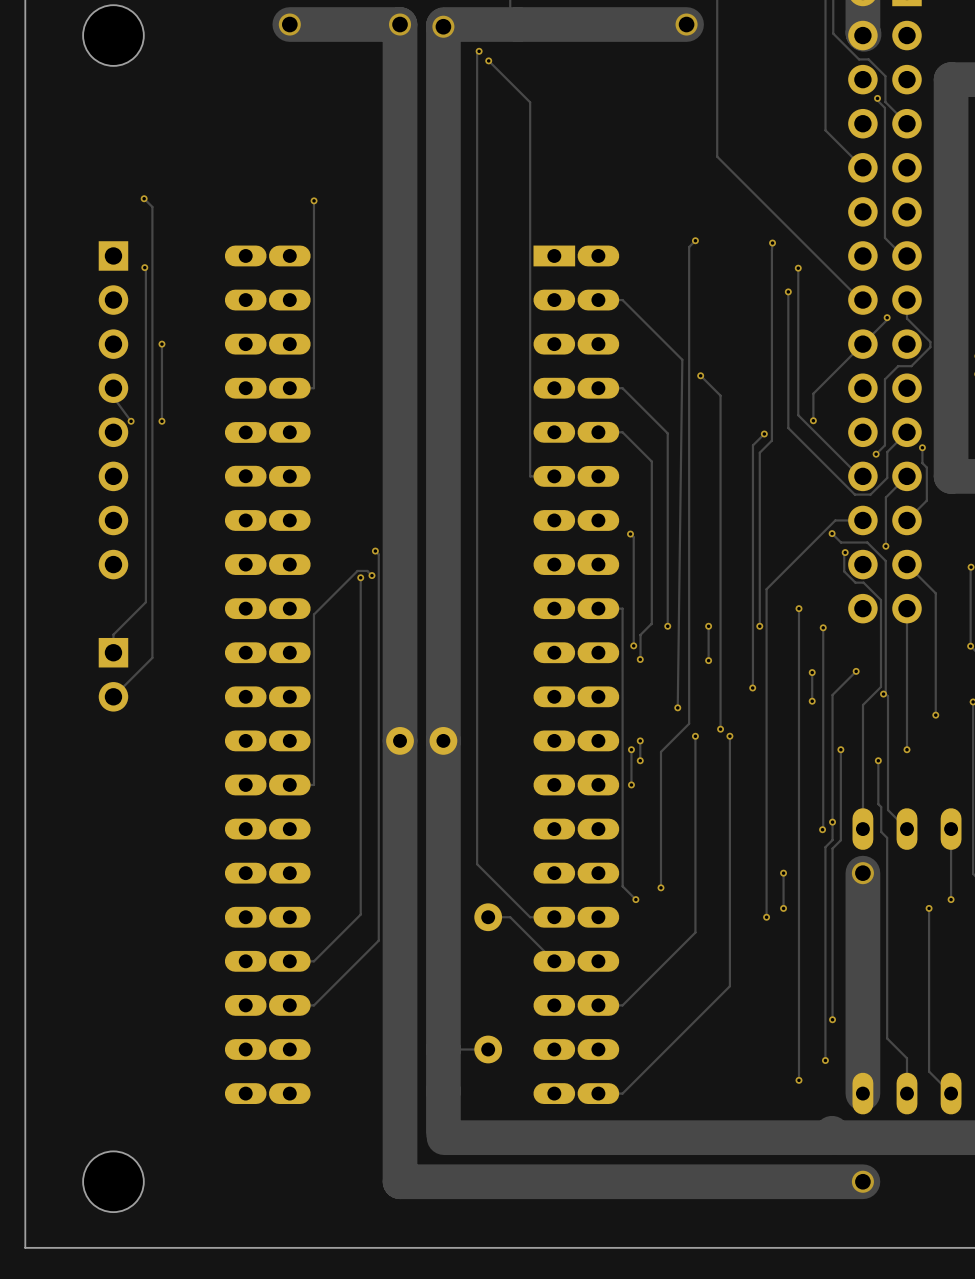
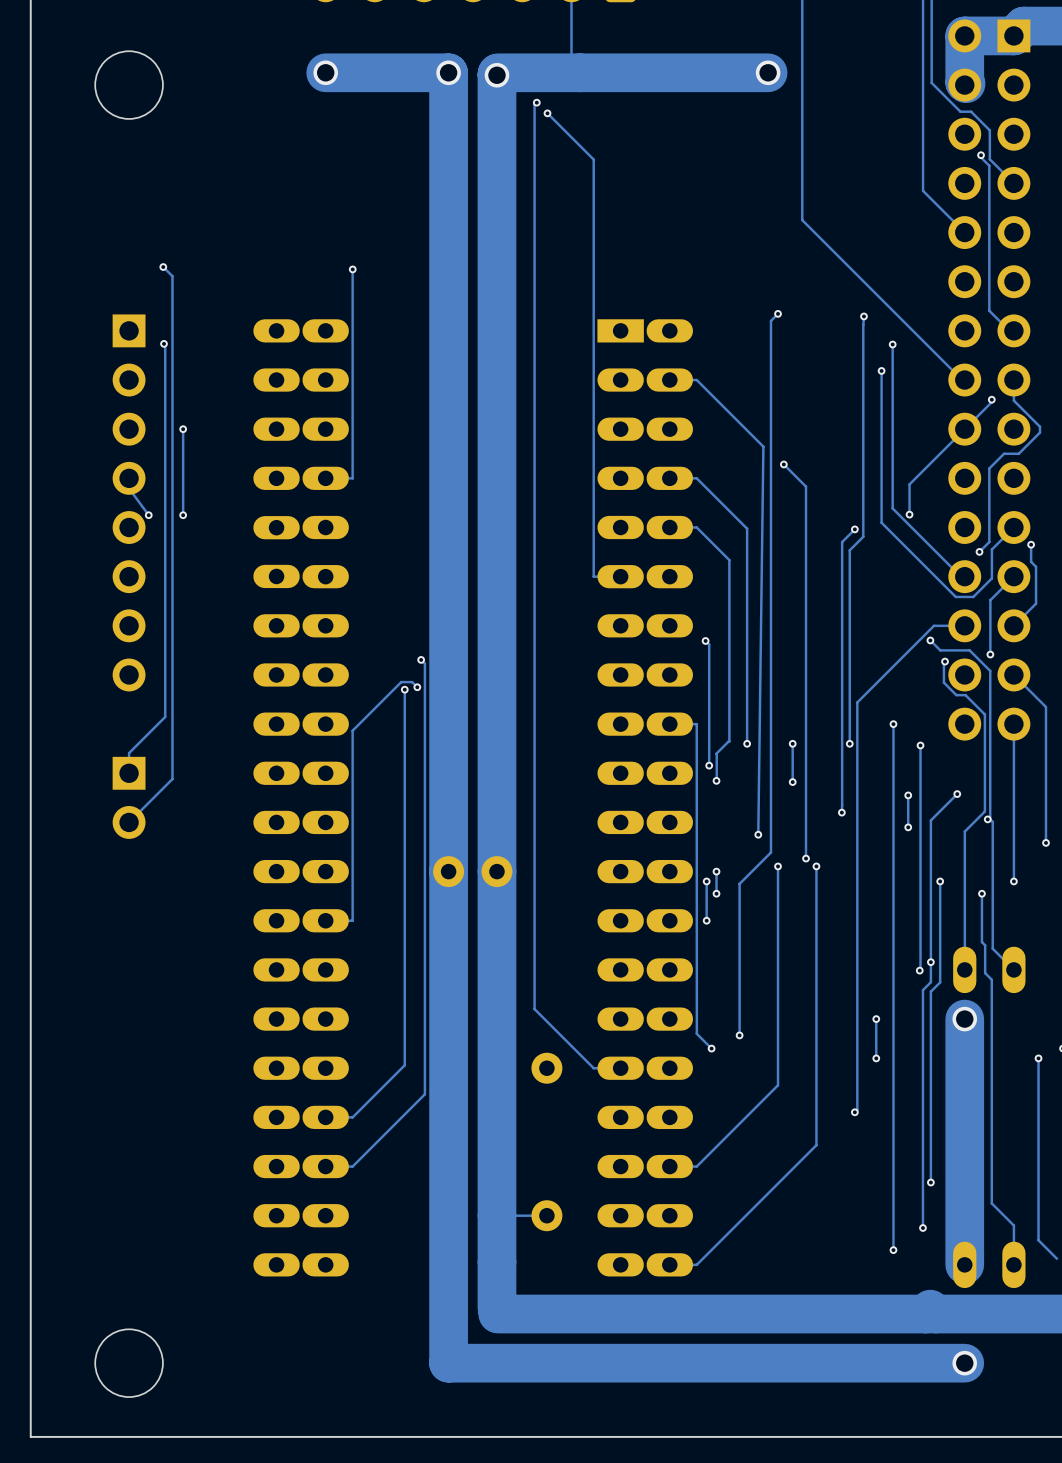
track: (488, 917) (510, 917) (554, 961) -> none
track: none -> (857, 1068) (857, 1109) (854, 1112)
via position: (766, 917) -> (854, 1112)

